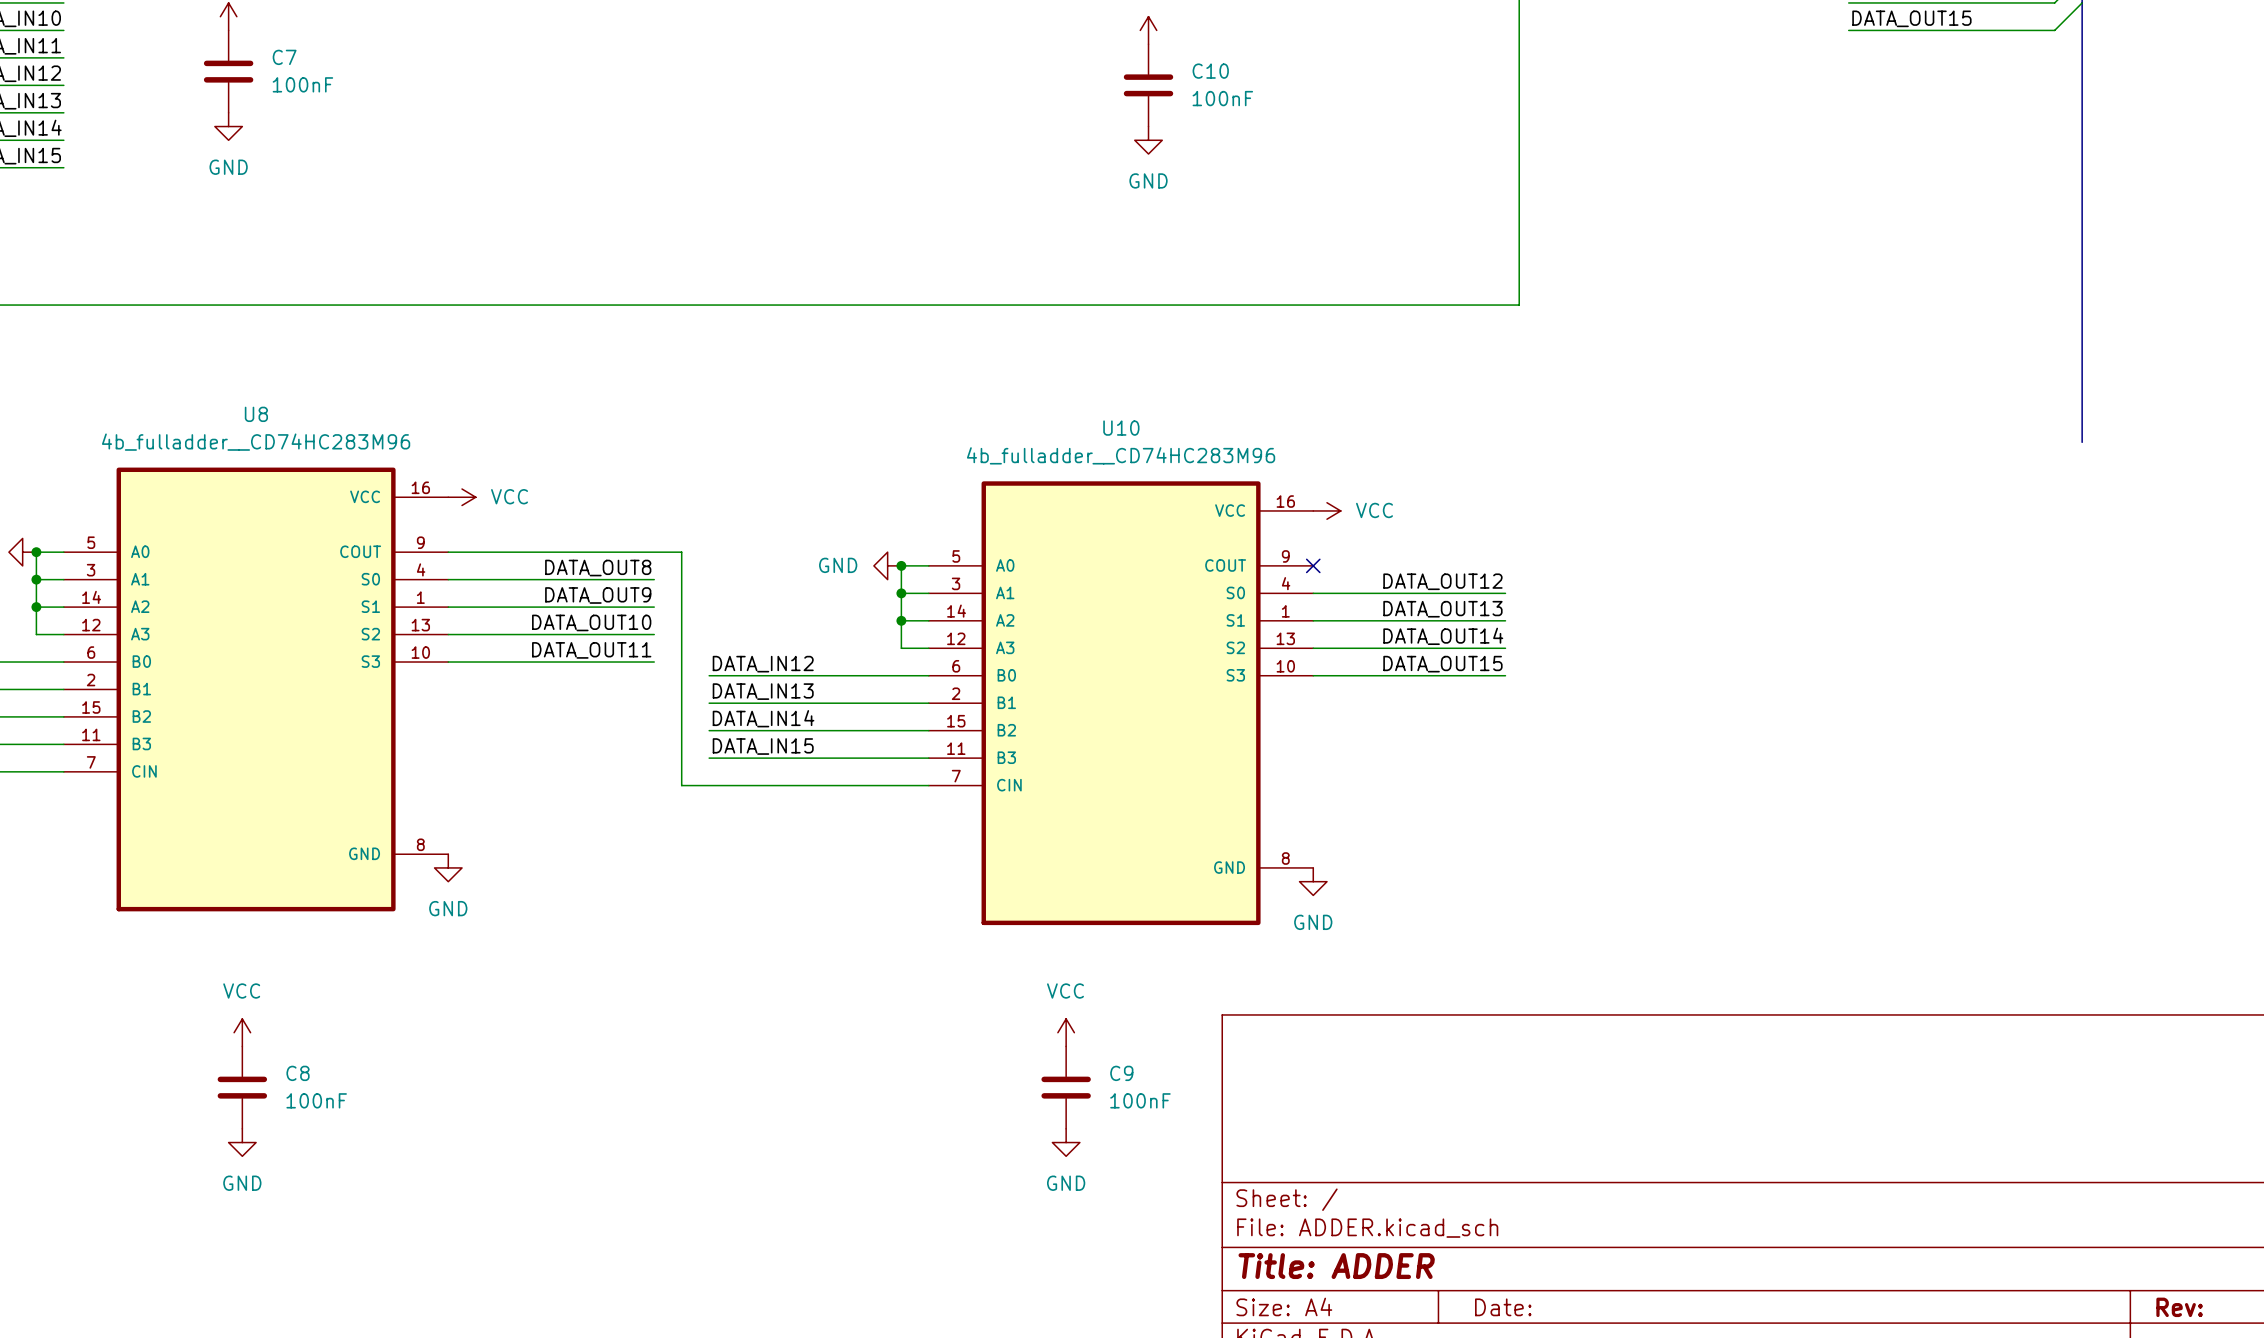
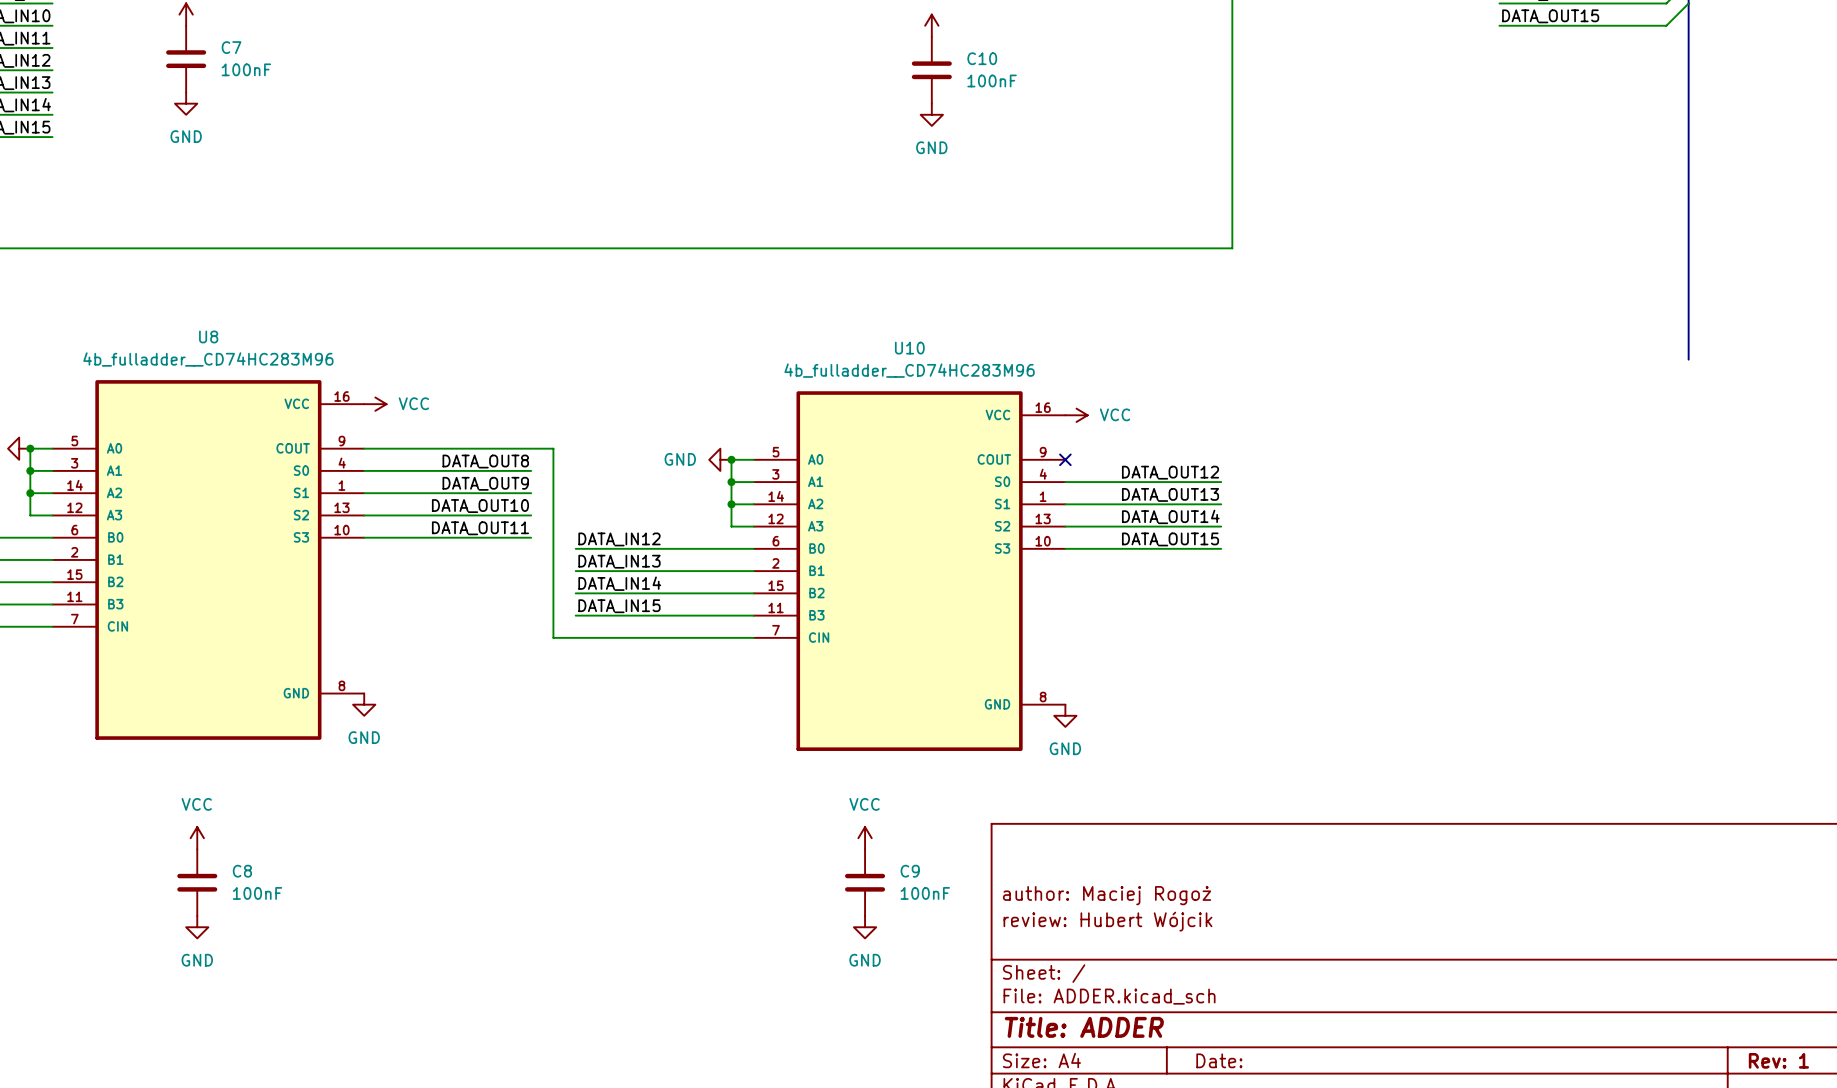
title block: none -> author: Maciej Rogoż (1107, 895)
title block: none -> review: Hubert Wójcik (1107, 921)
title block: Rev: (2179, 1307) -> Rev: 1 (1778, 1060)

